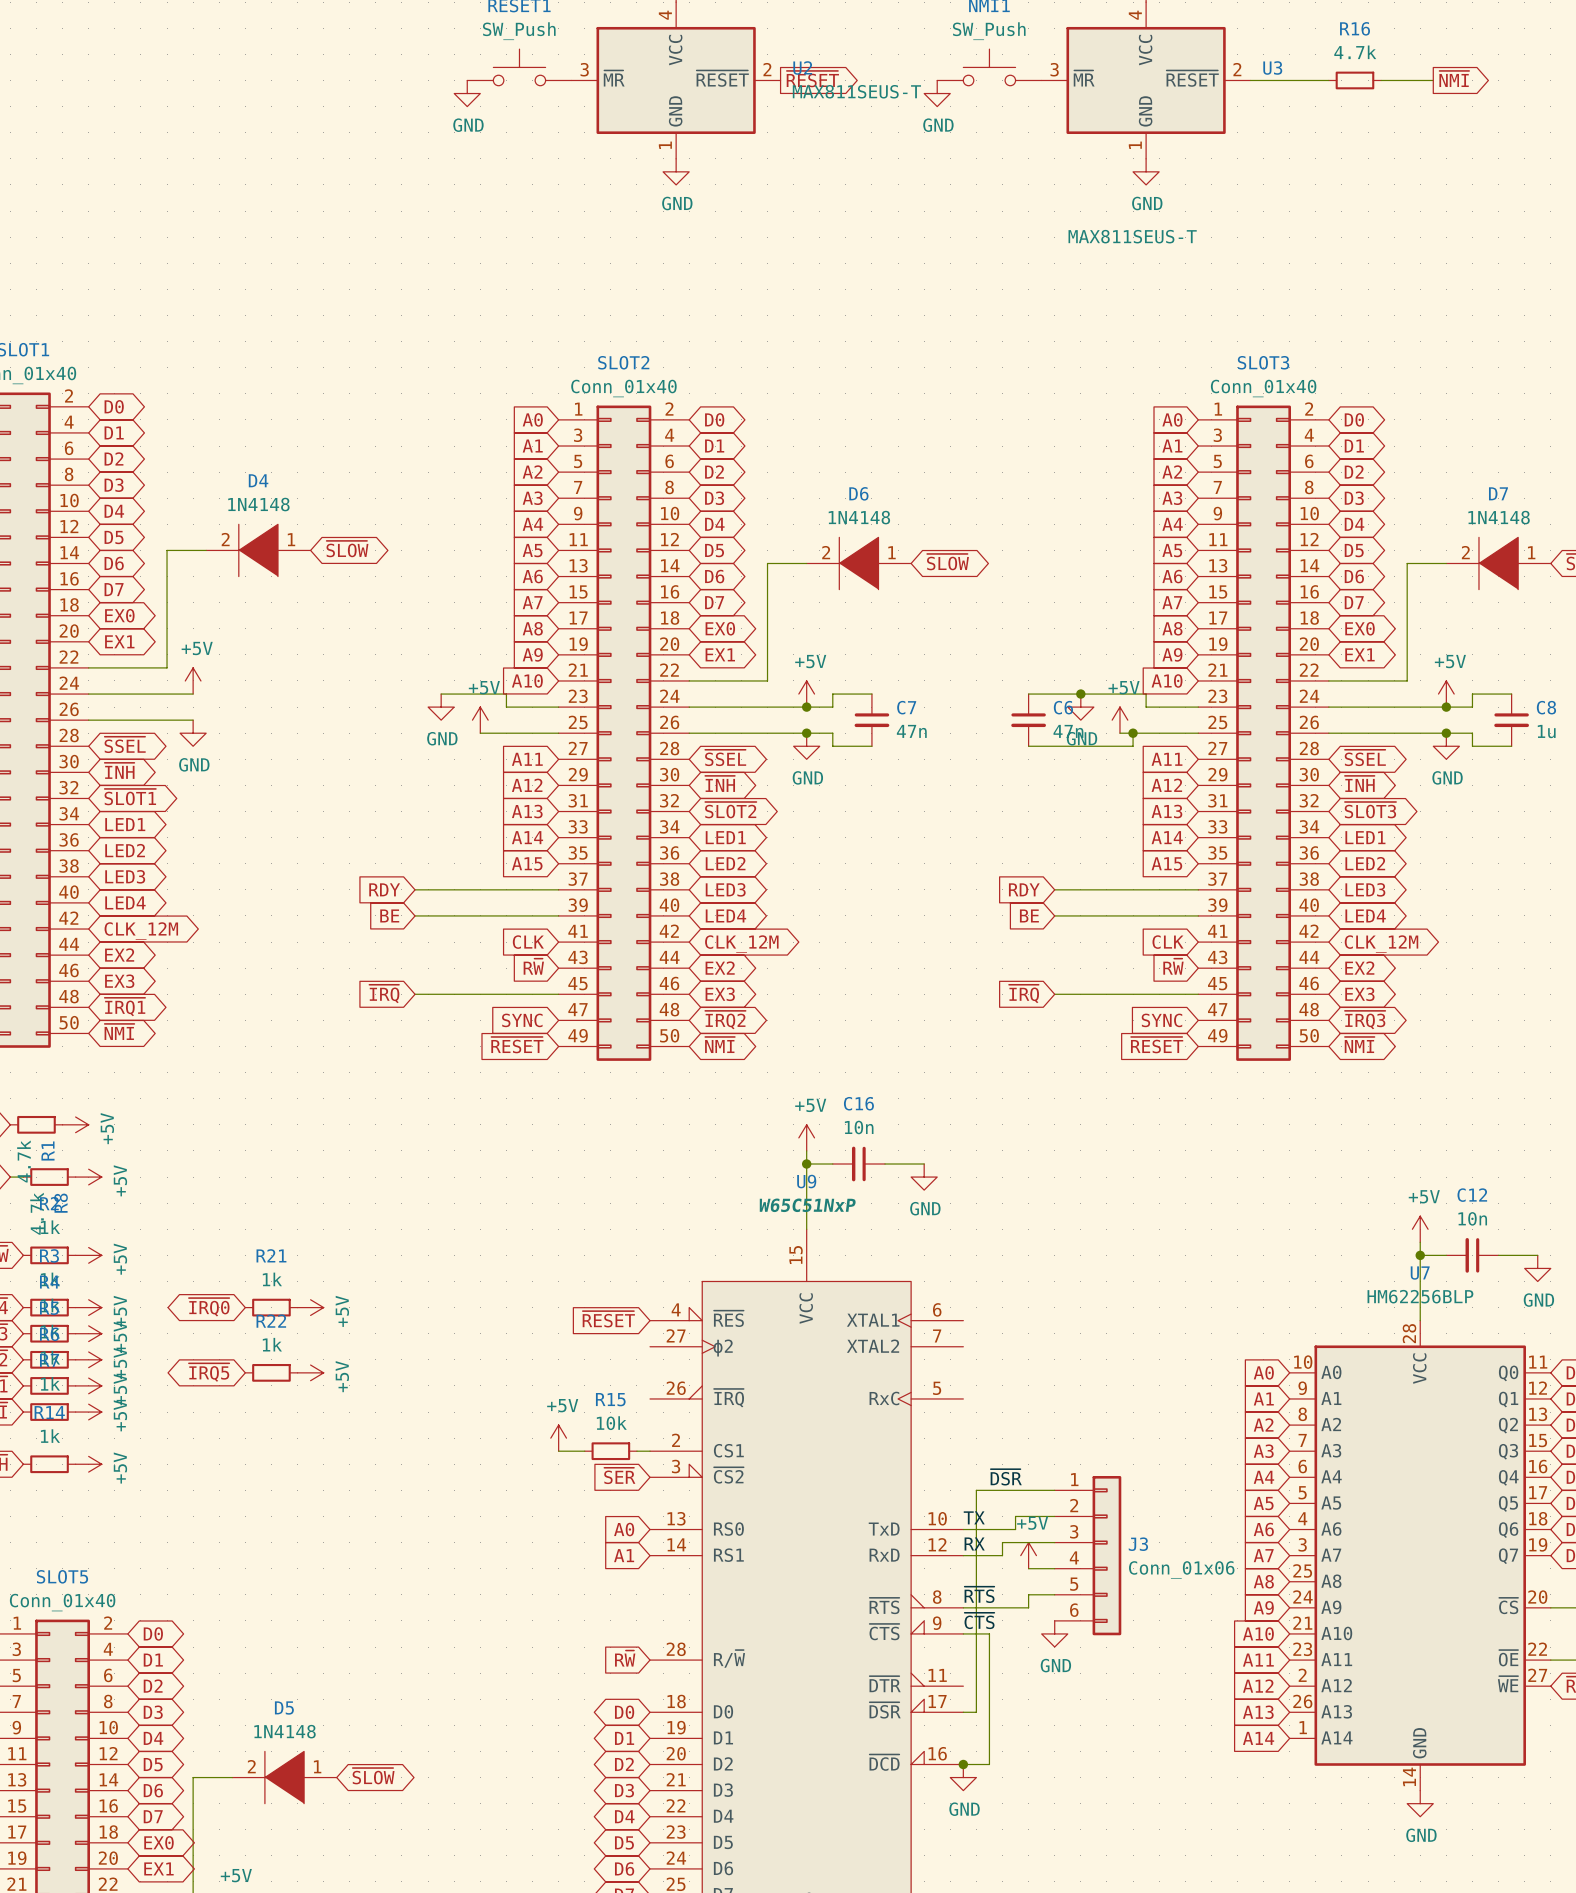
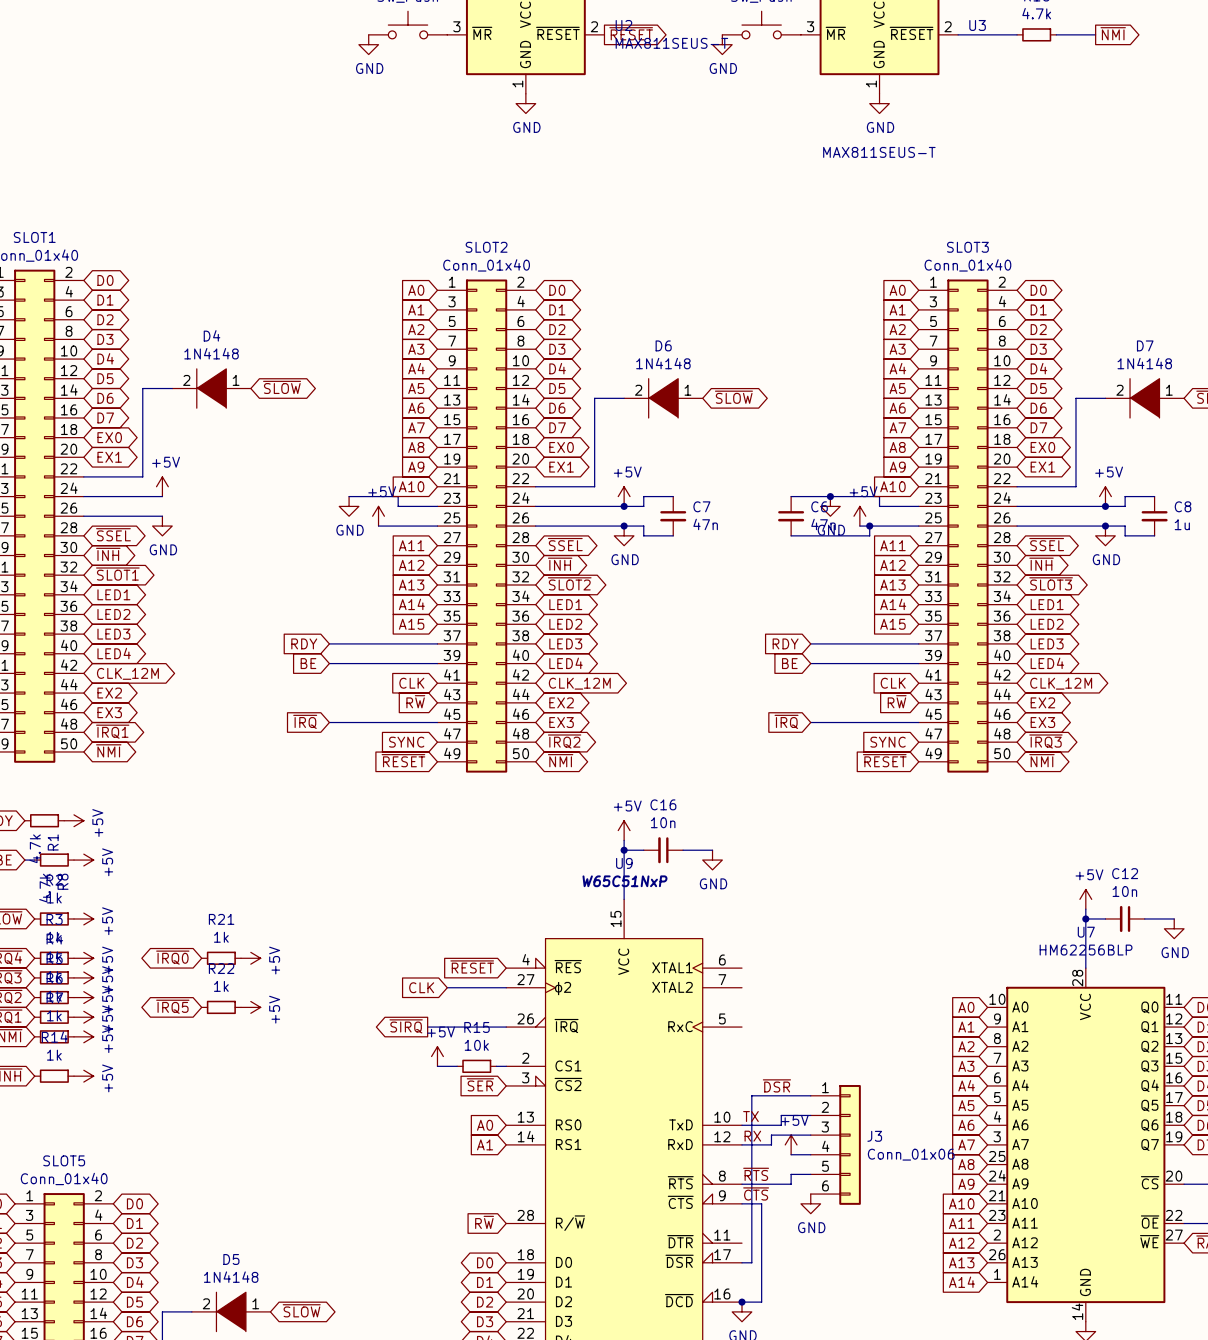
global label: none -> CLK (421, 987)
wire: none -> (447, 987) (506, 987)
global label: none -> ~{SIRQ} (406, 1026)
wire: none -> (427, 1027) (506, 1027)

